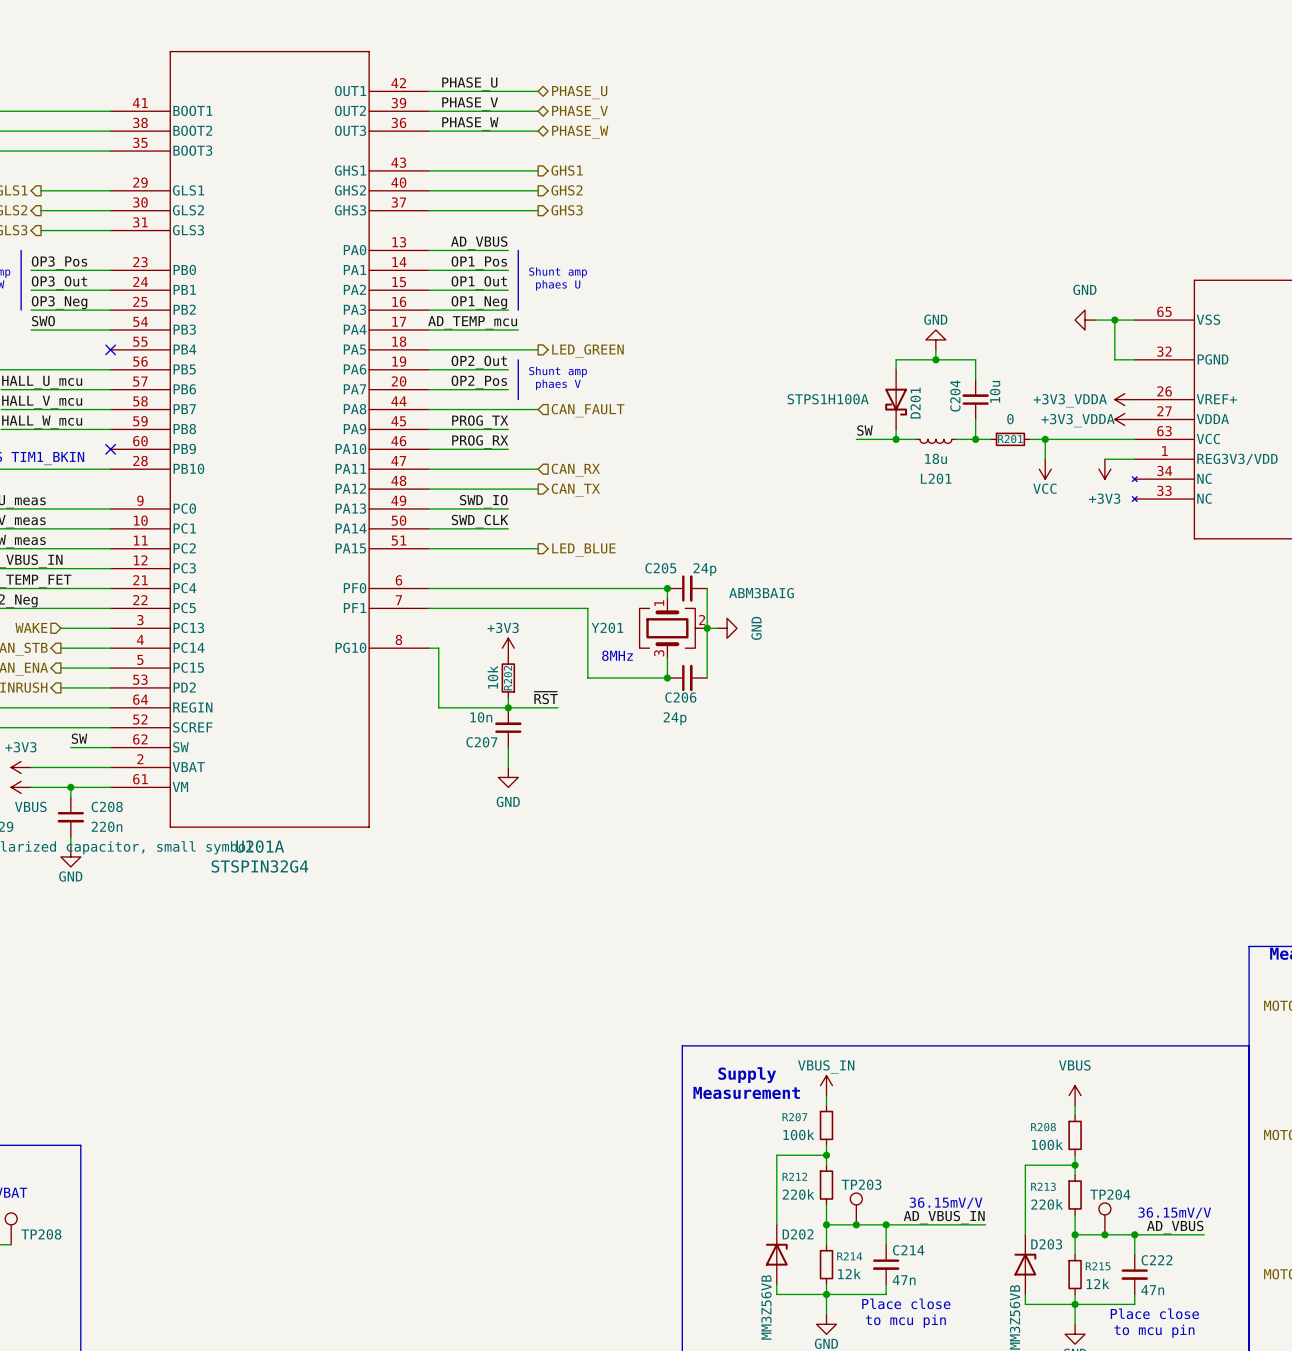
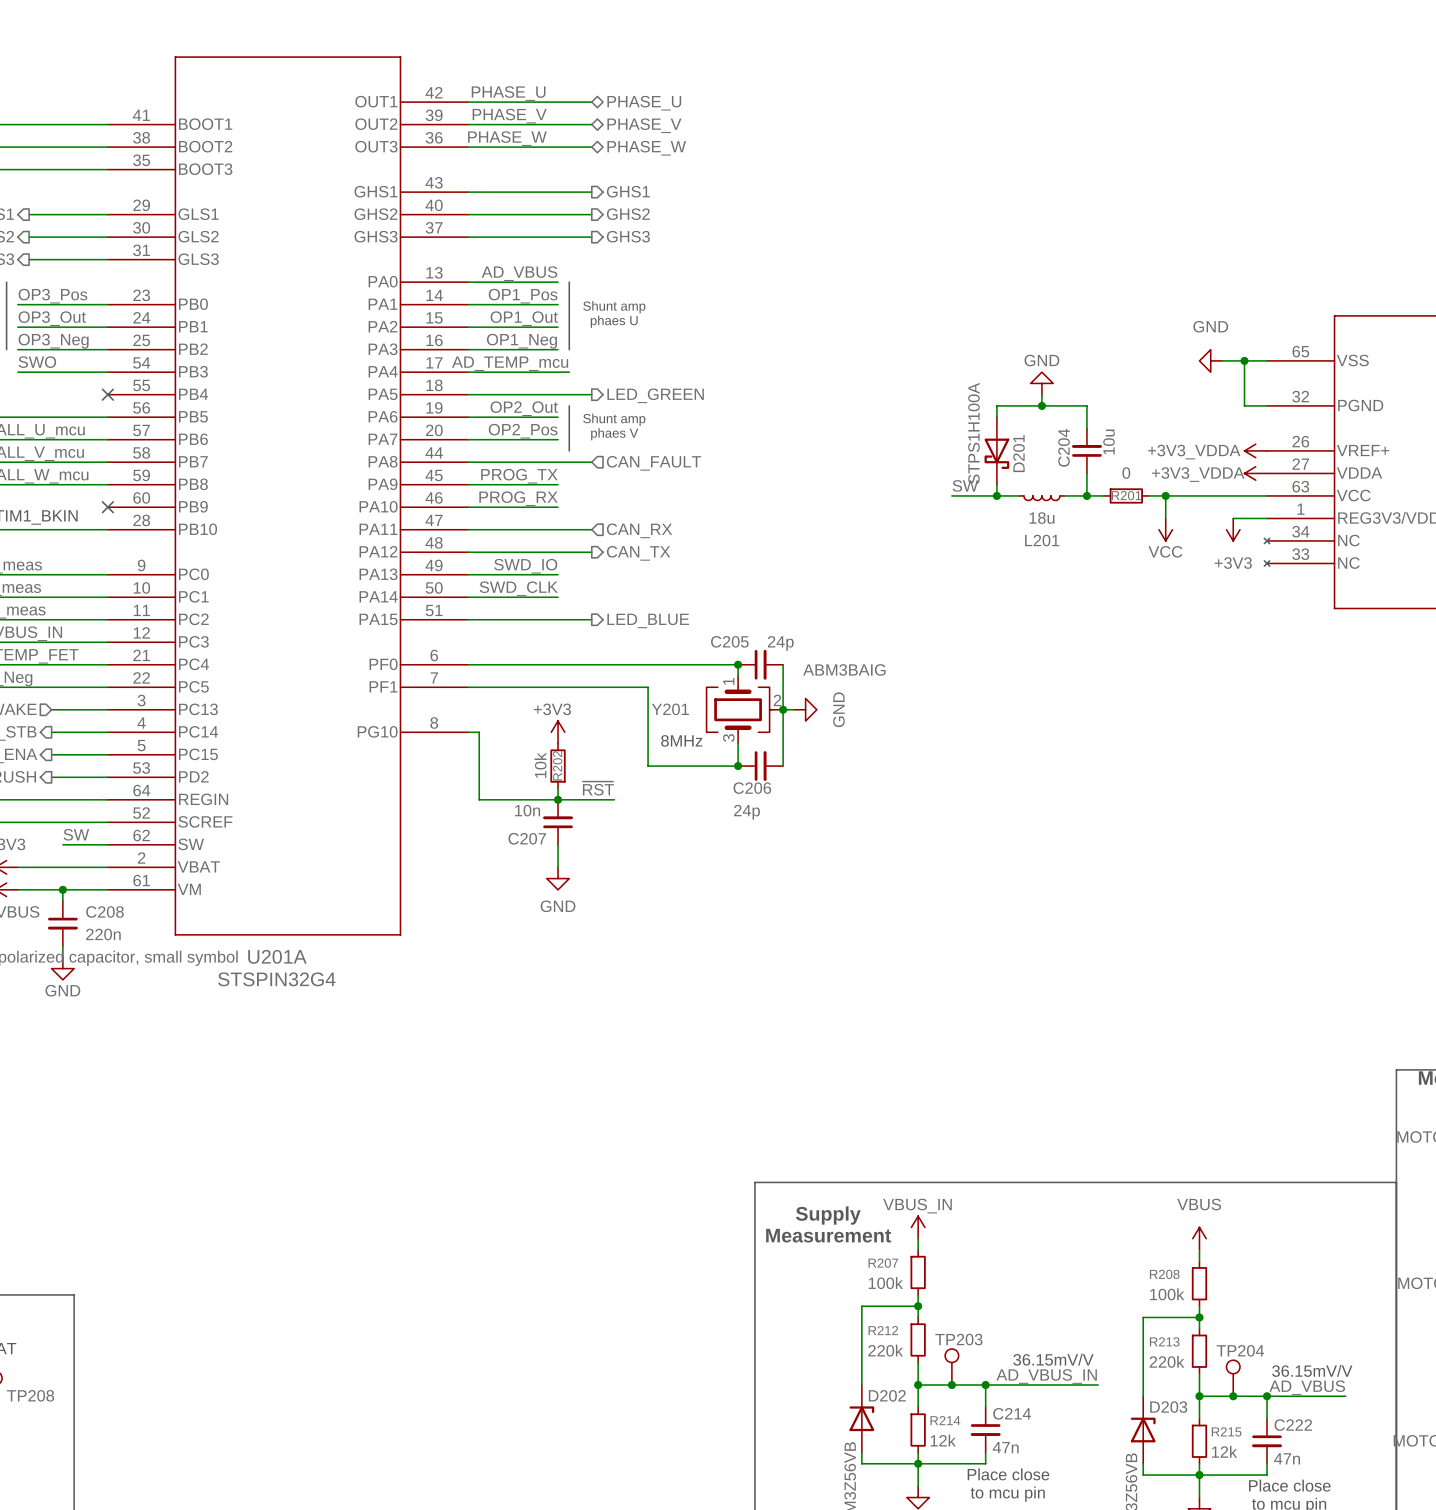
D201 value rotation: 0° (828, 399) -> 90° counterclockwise (973, 433)

